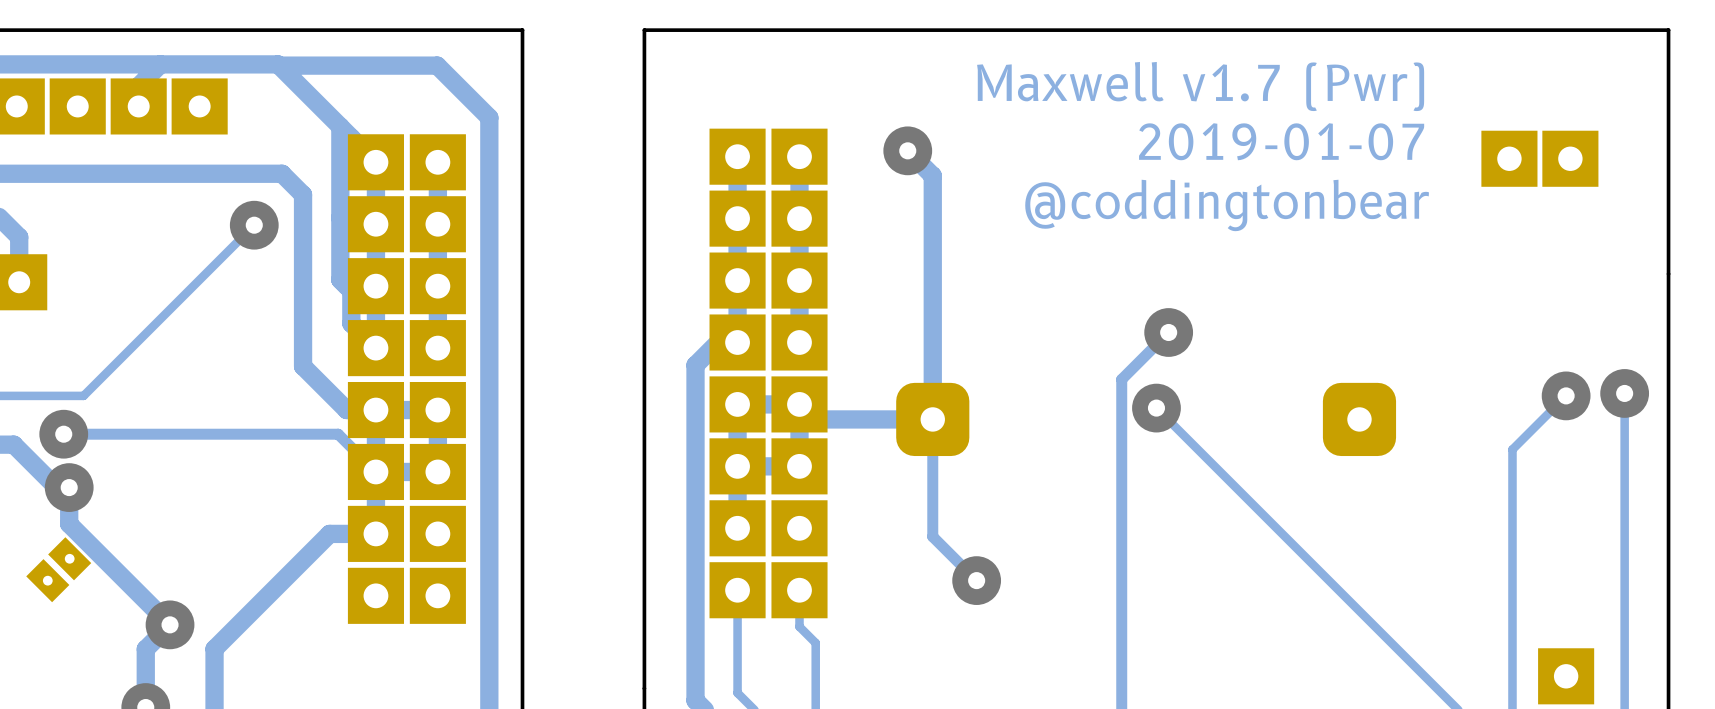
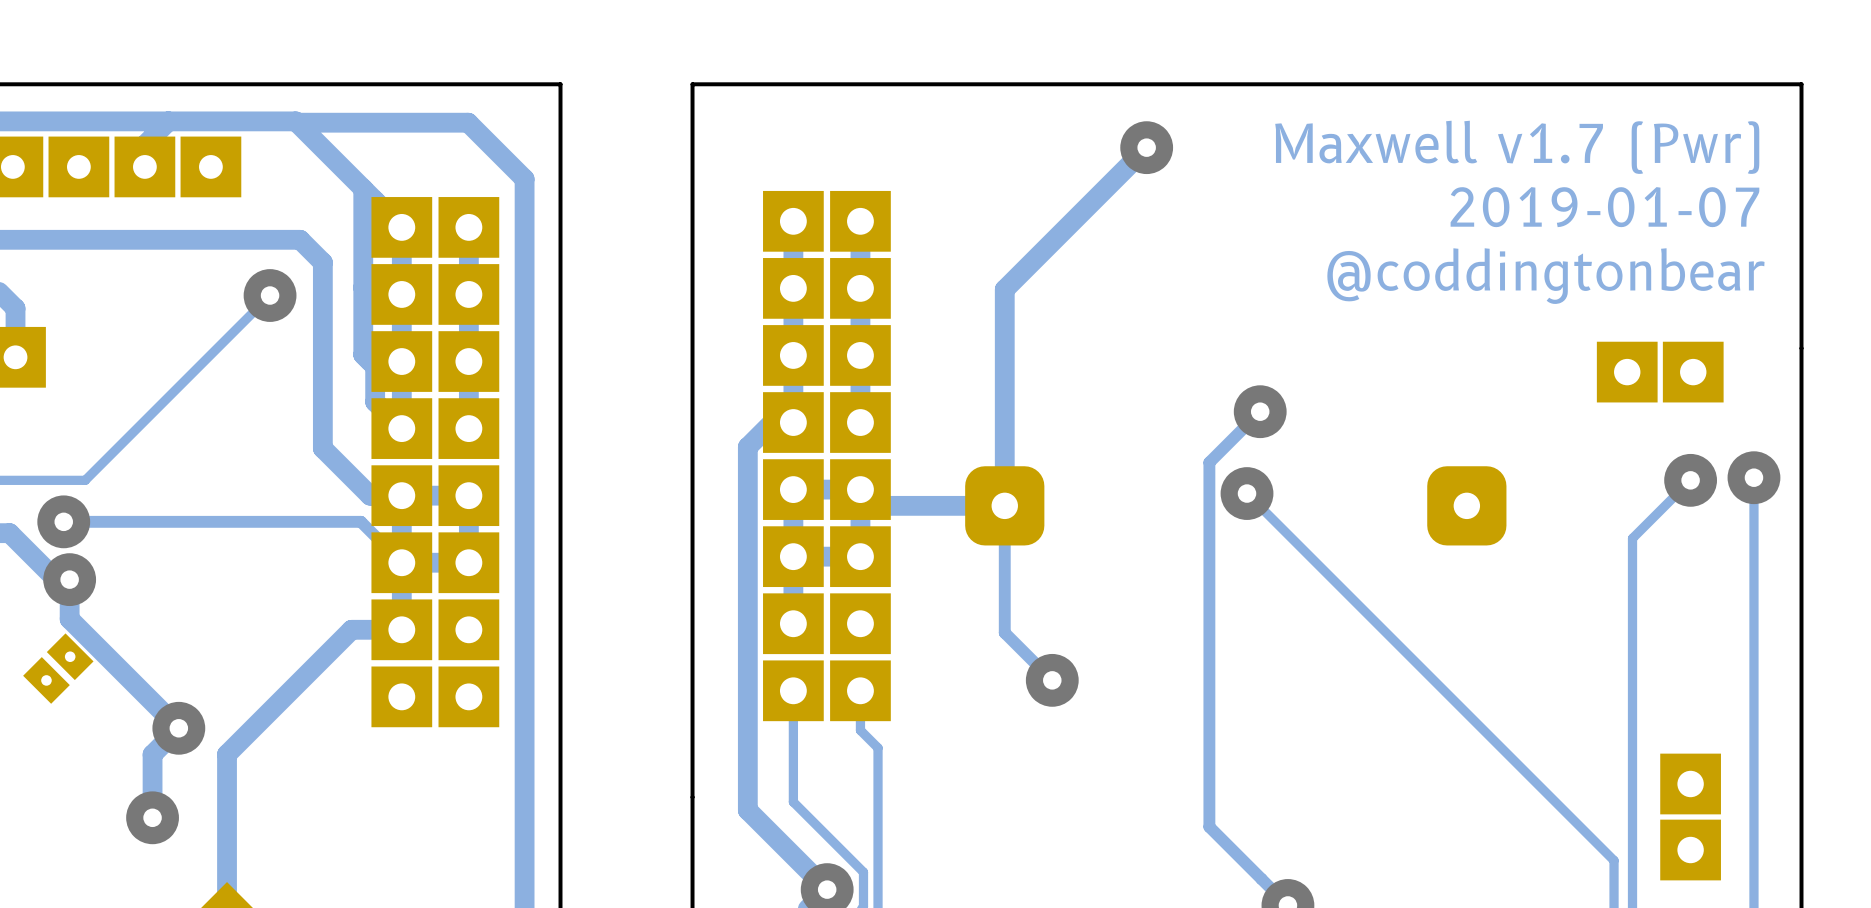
text position: Maxwell v1.7 (Pwr) (1200, 86) -> Maxwell v1.7 (Pwr) (1517, 147)
via: none -> (1146, 147)
text position: 2019-01-07 (1281, 141) -> 2019-01-07 (1604, 207)
track: (907, 150) (932, 175) (932, 219) -> (1146, 147) (1004, 289)
via: (907, 150) -> none
part position: (1539, 158) -> (1660, 372)
text position: @coddingtonbear (1227, 205) -> @coddingtonbear (1545, 276)

